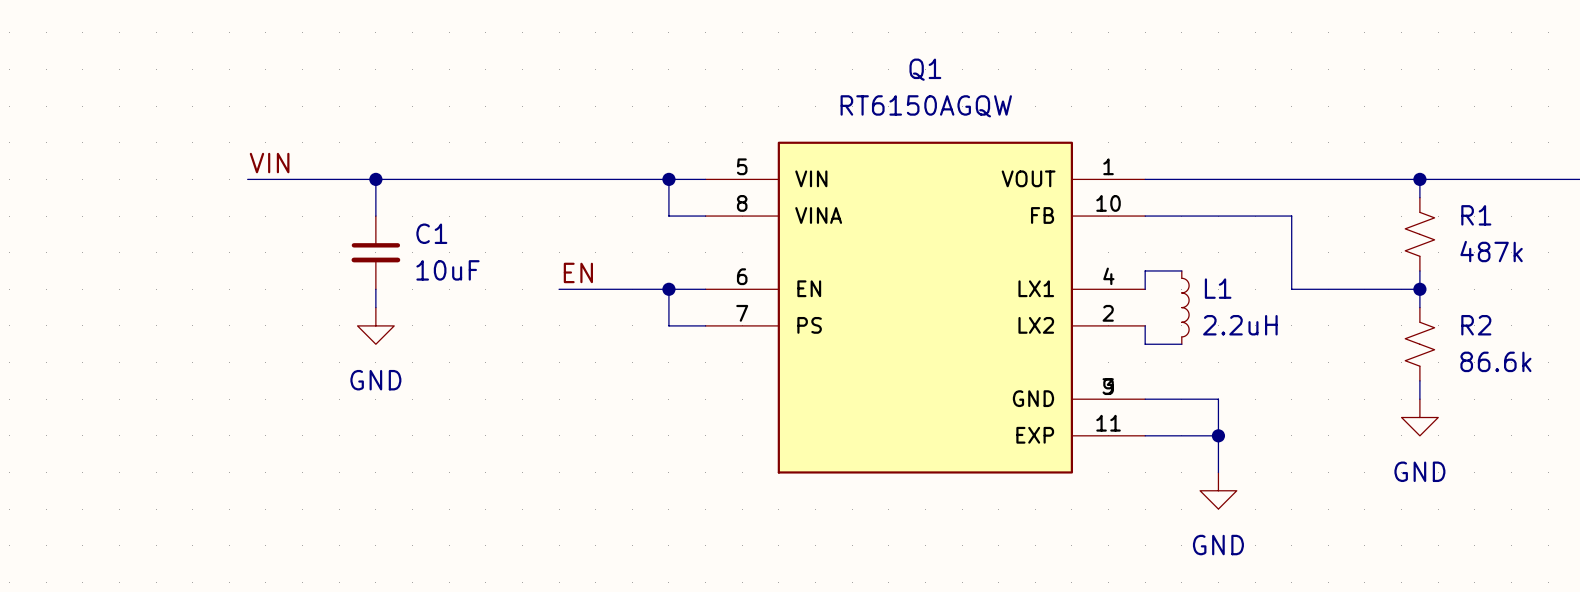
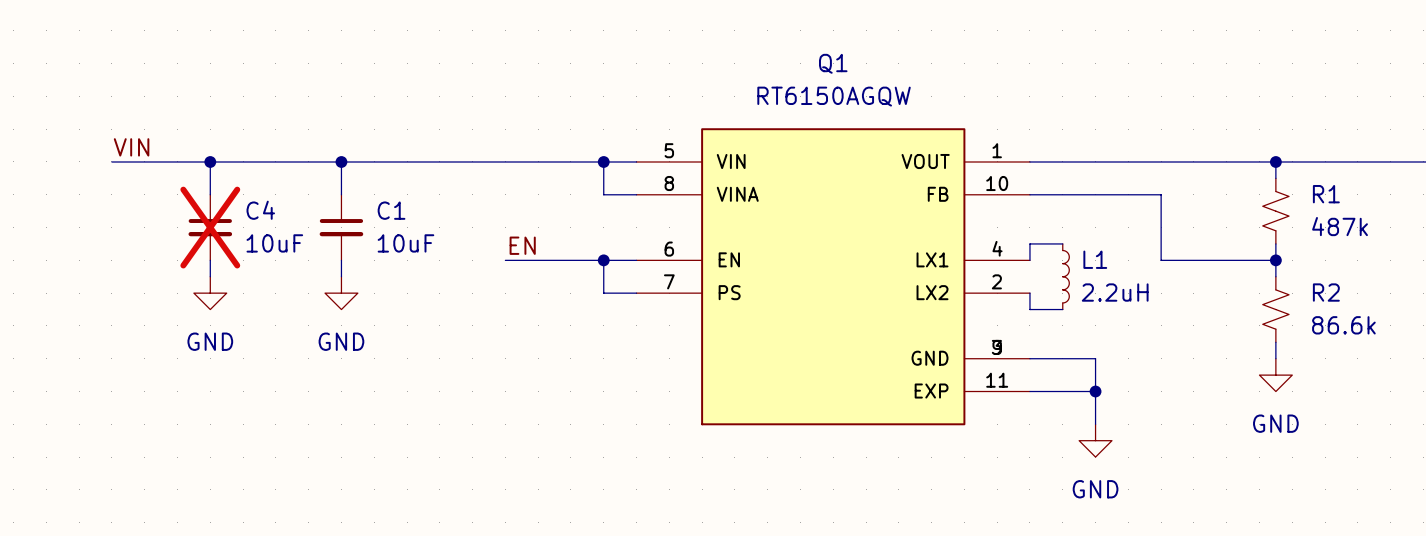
label position: VIN (269, 163) -> VIN (131, 147)
wire: none -> (111, 161) (226, 161)
wire: none -> (210, 161) (210, 194)
junction: none -> (210, 161)
C4: none -> 10uF (210, 227)
wire: none -> (210, 260) (210, 276)
power symbol: none -> GND (210, 293)

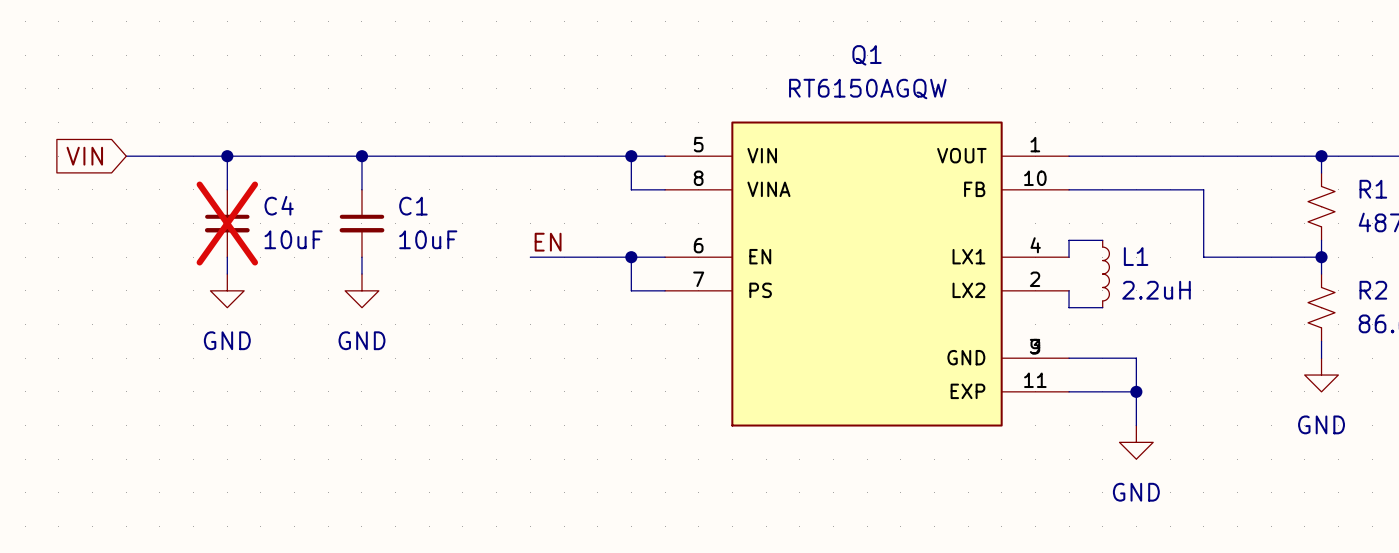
label: VIN (131, 147) -> none
global label: none -> VIN (84, 156)

